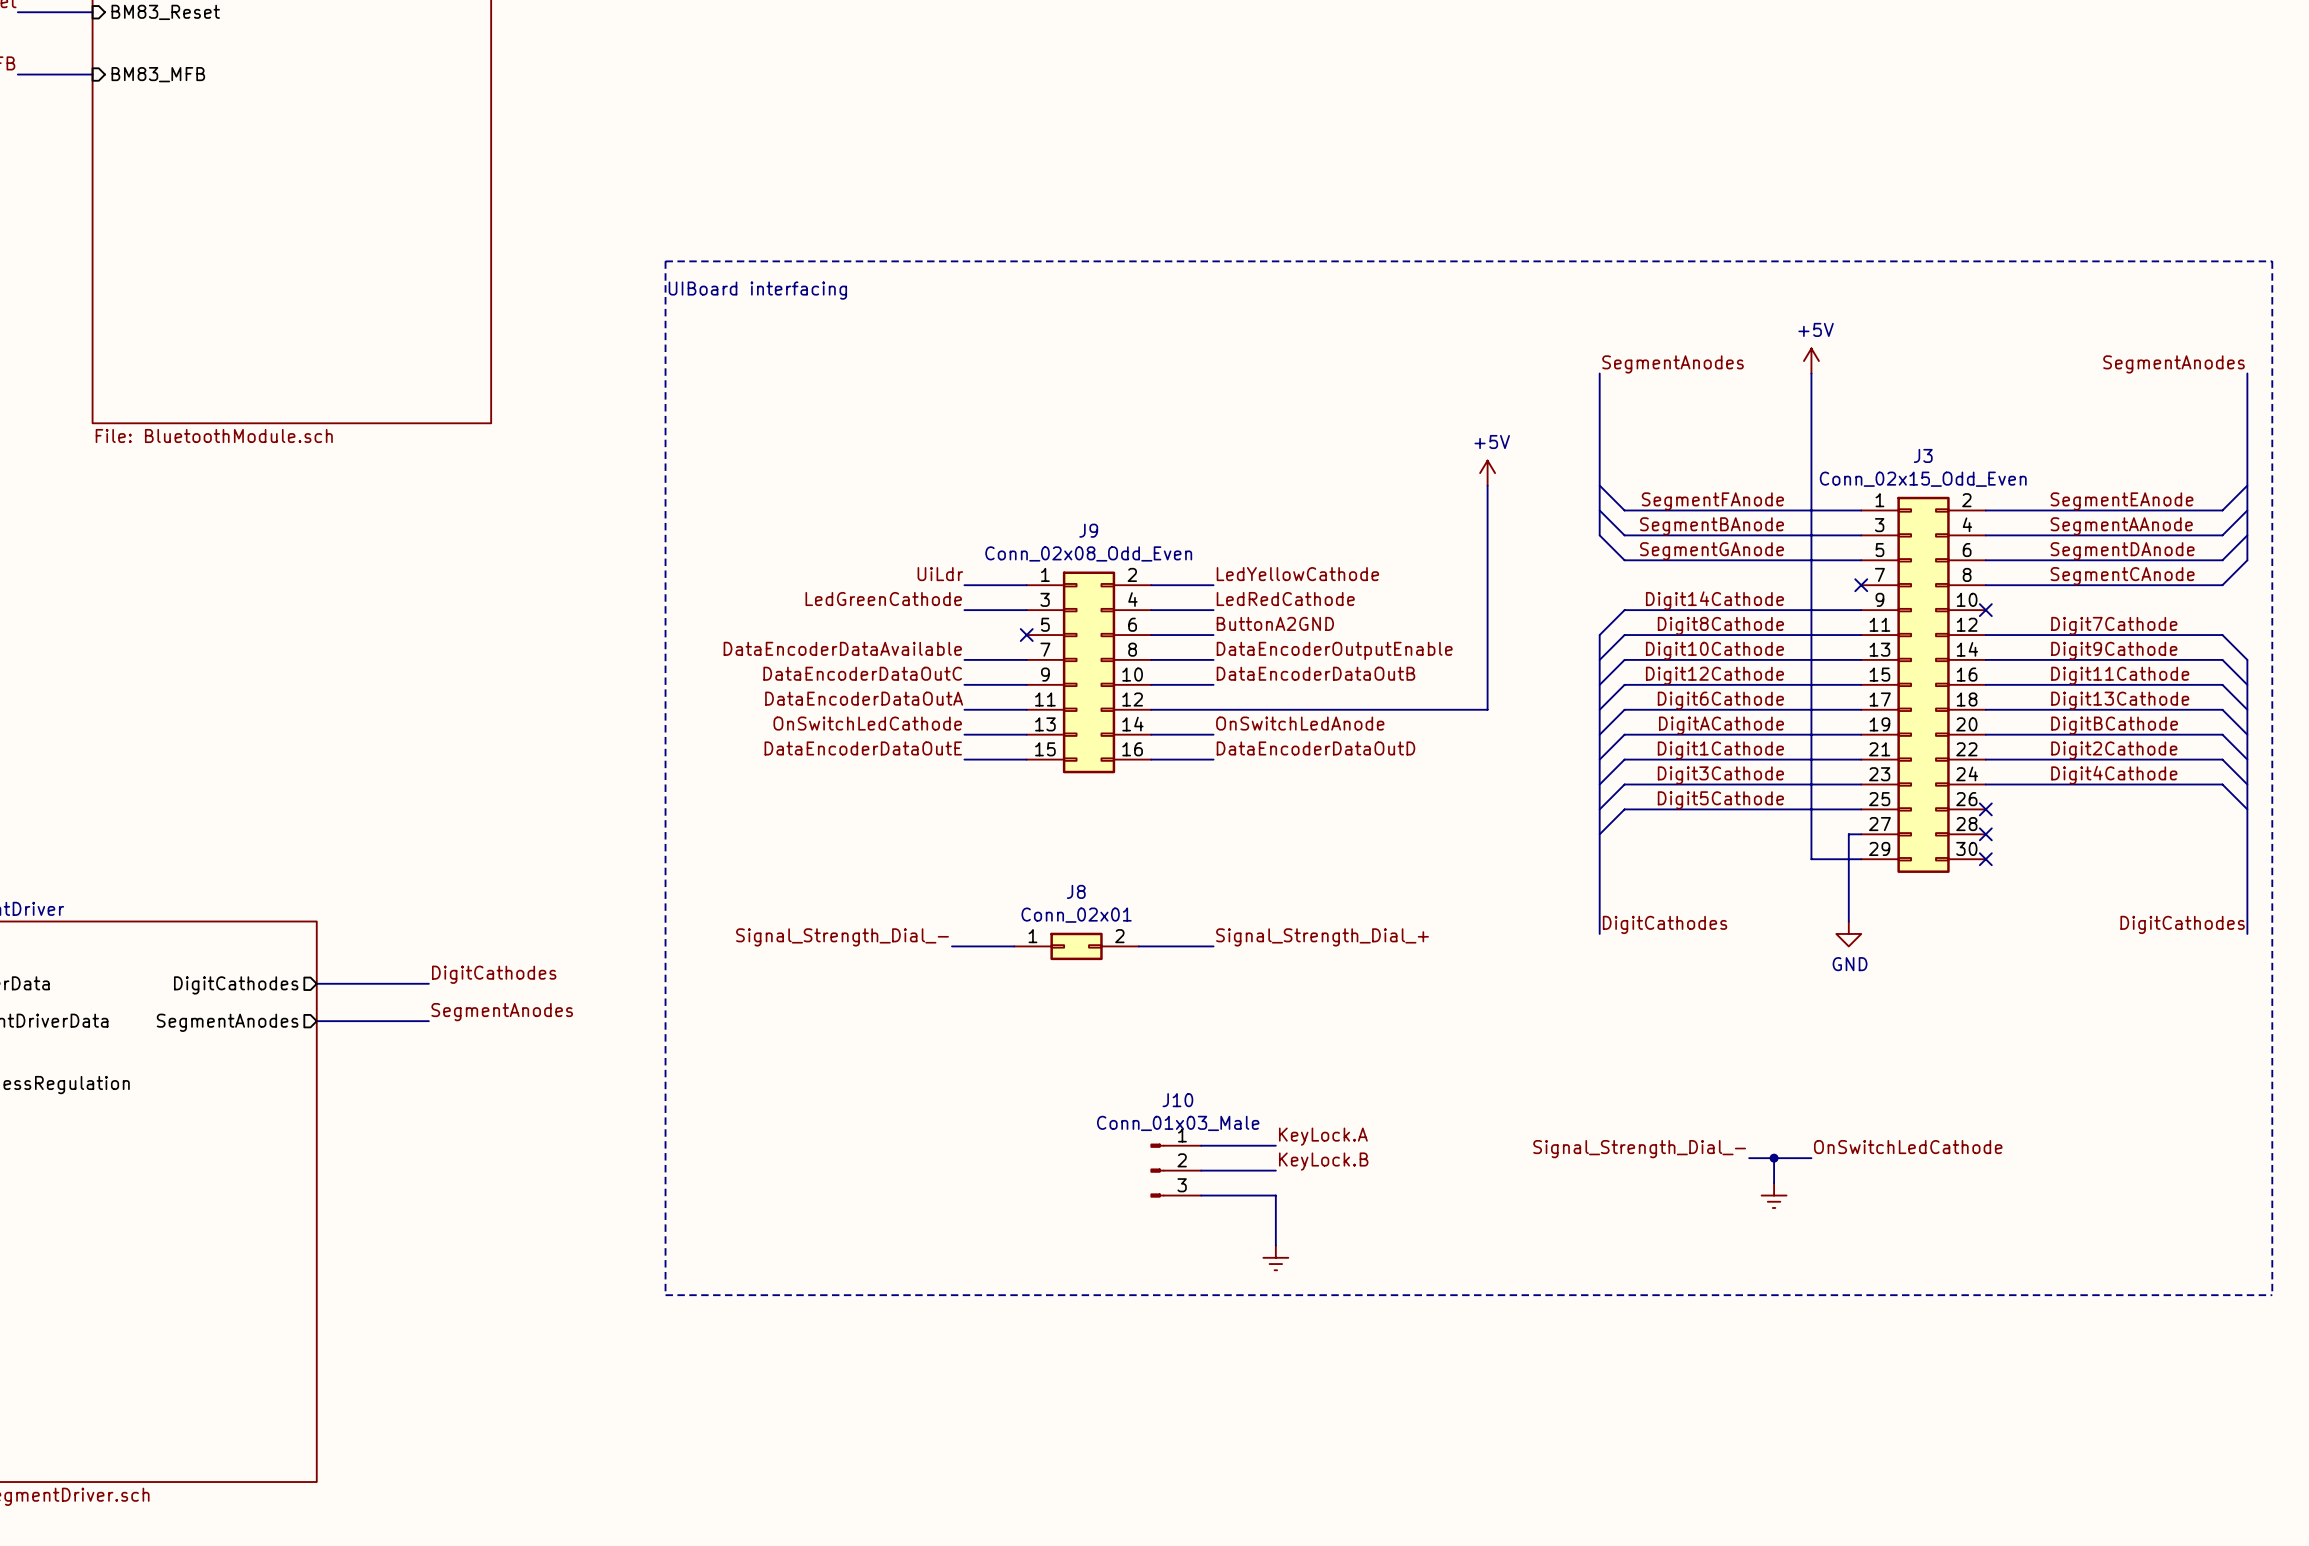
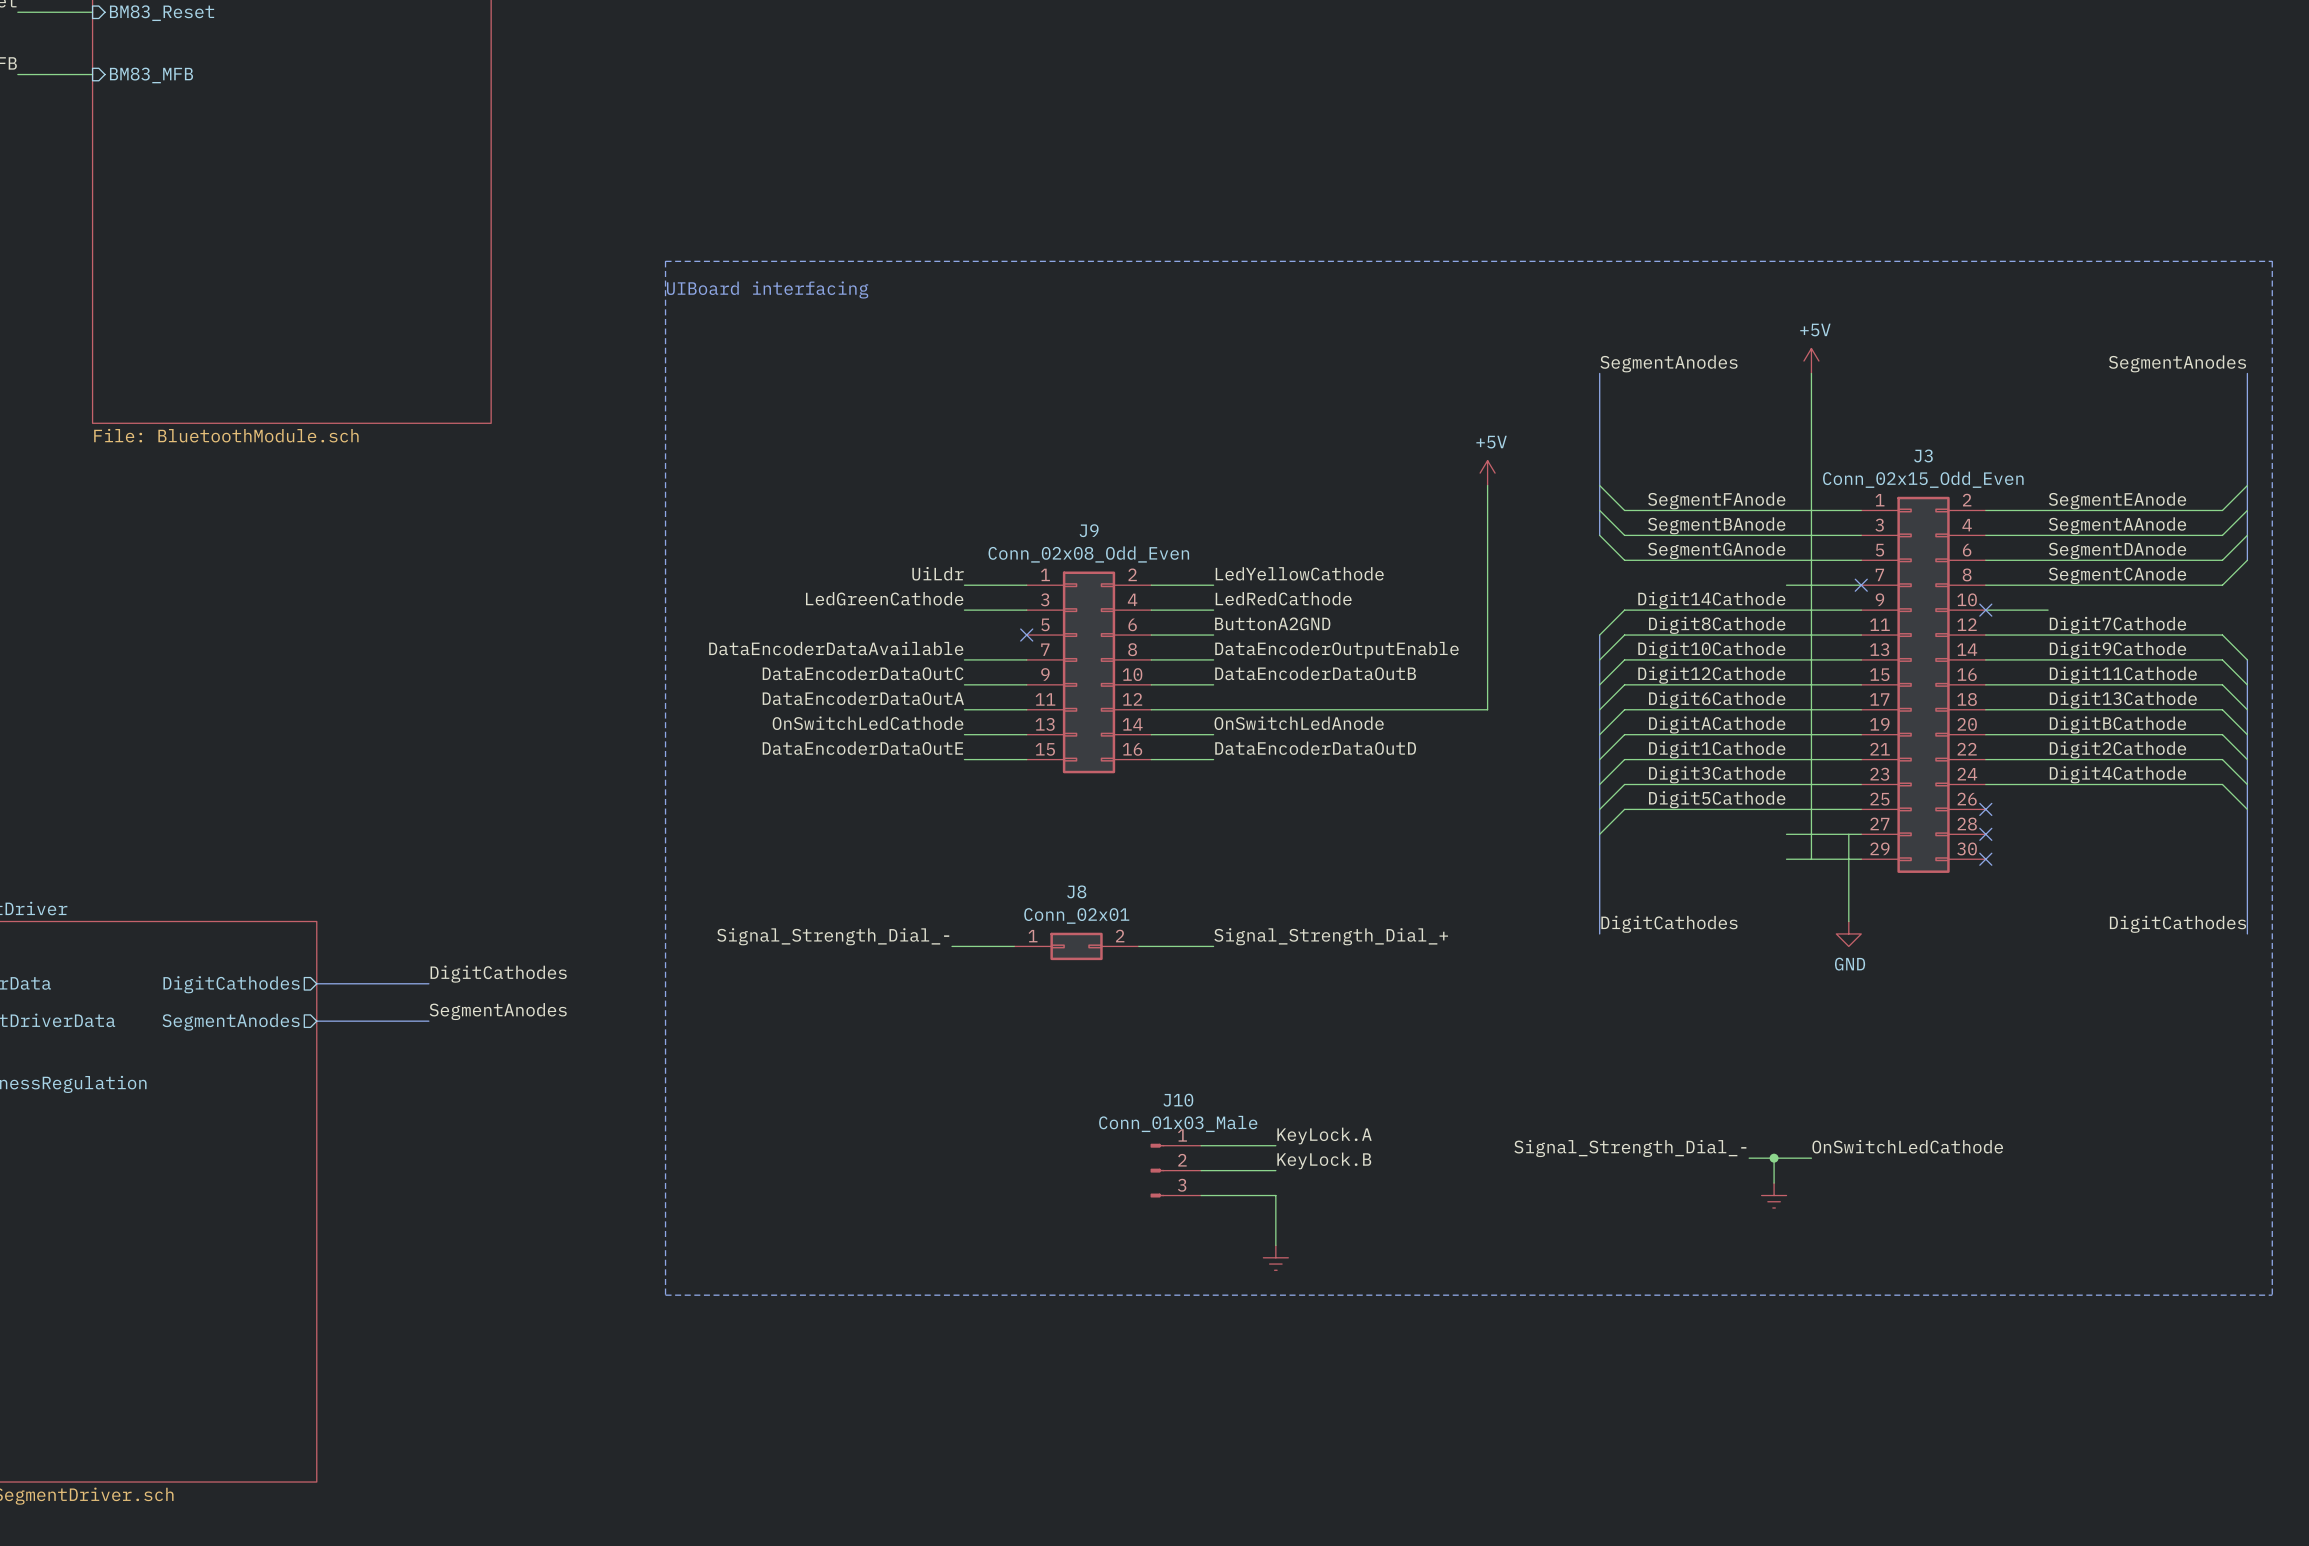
wire: none -> (1786, 585) (1861, 585)
wire: none -> (1985, 610) (2048, 610)
wire: none -> (1786, 834) (1848, 834)
wire: none -> (1786, 859) (1811, 859)

